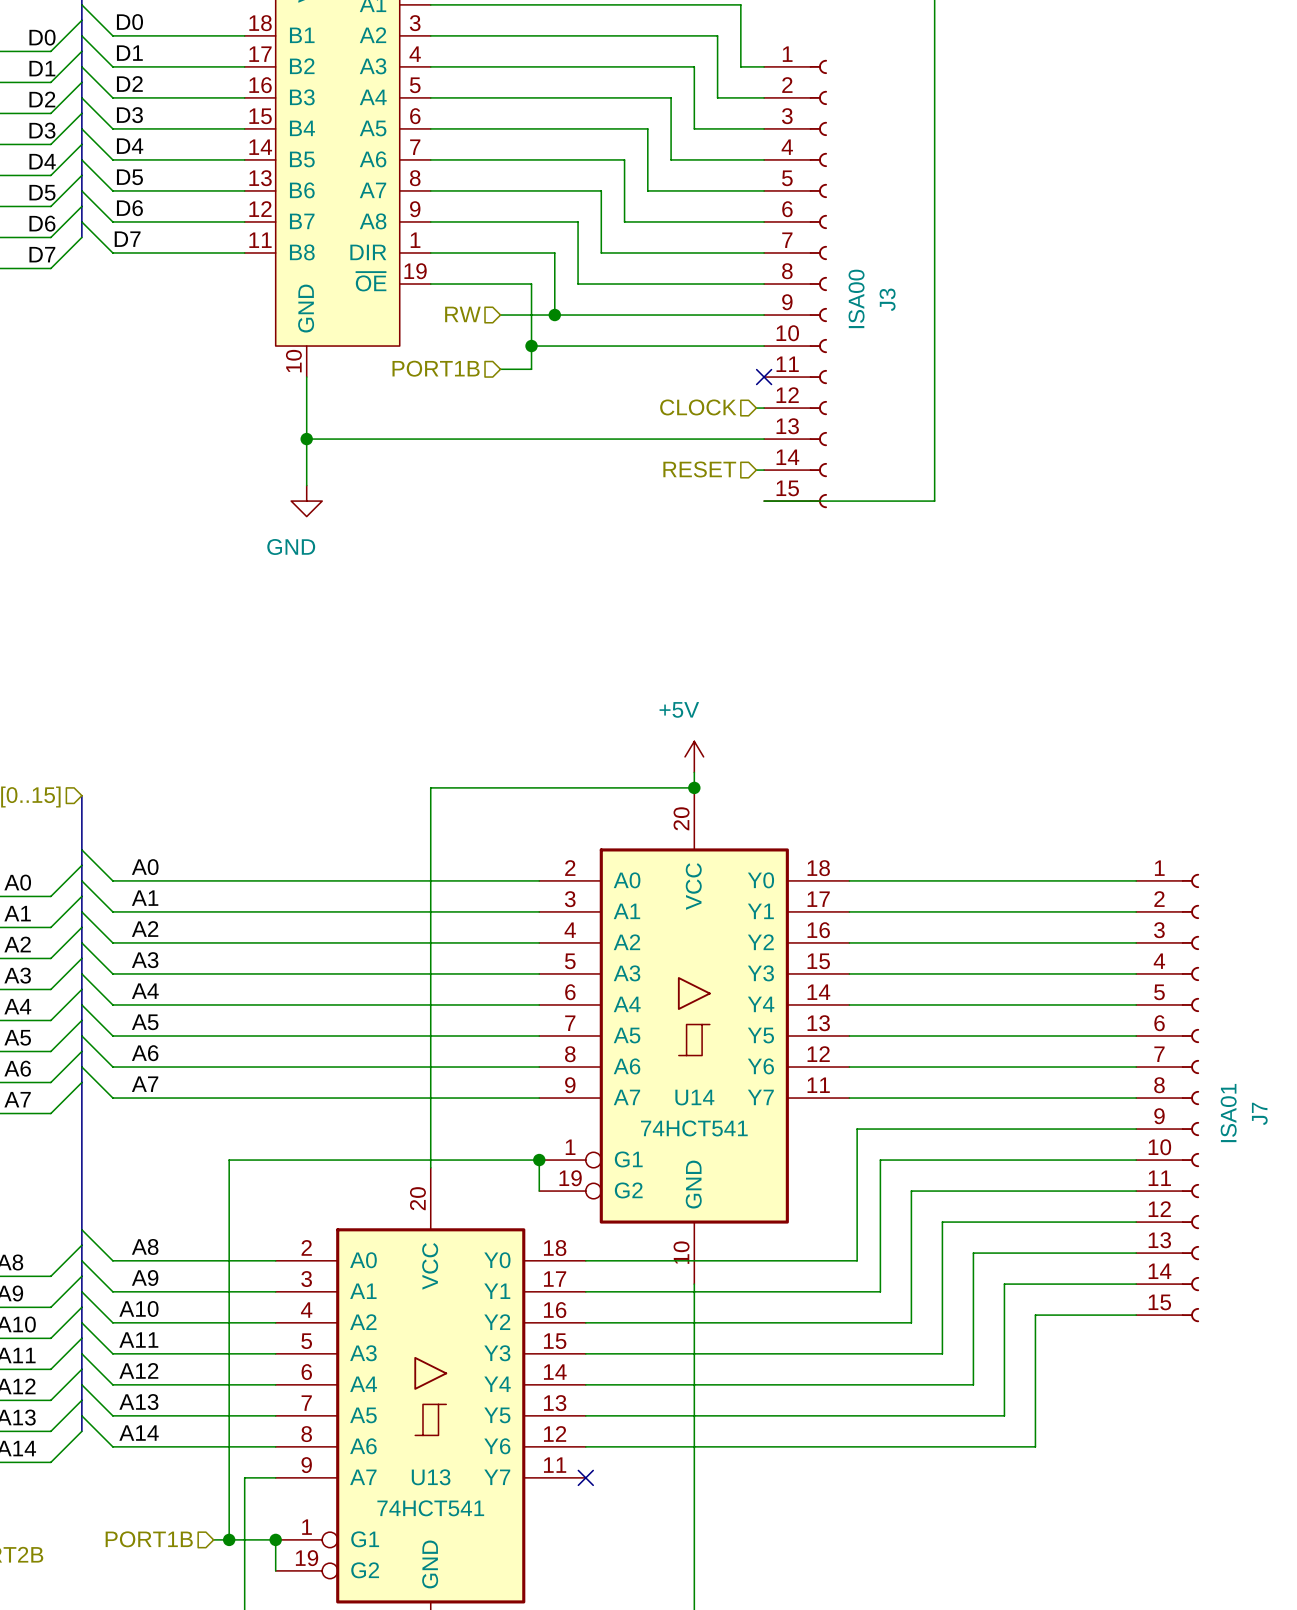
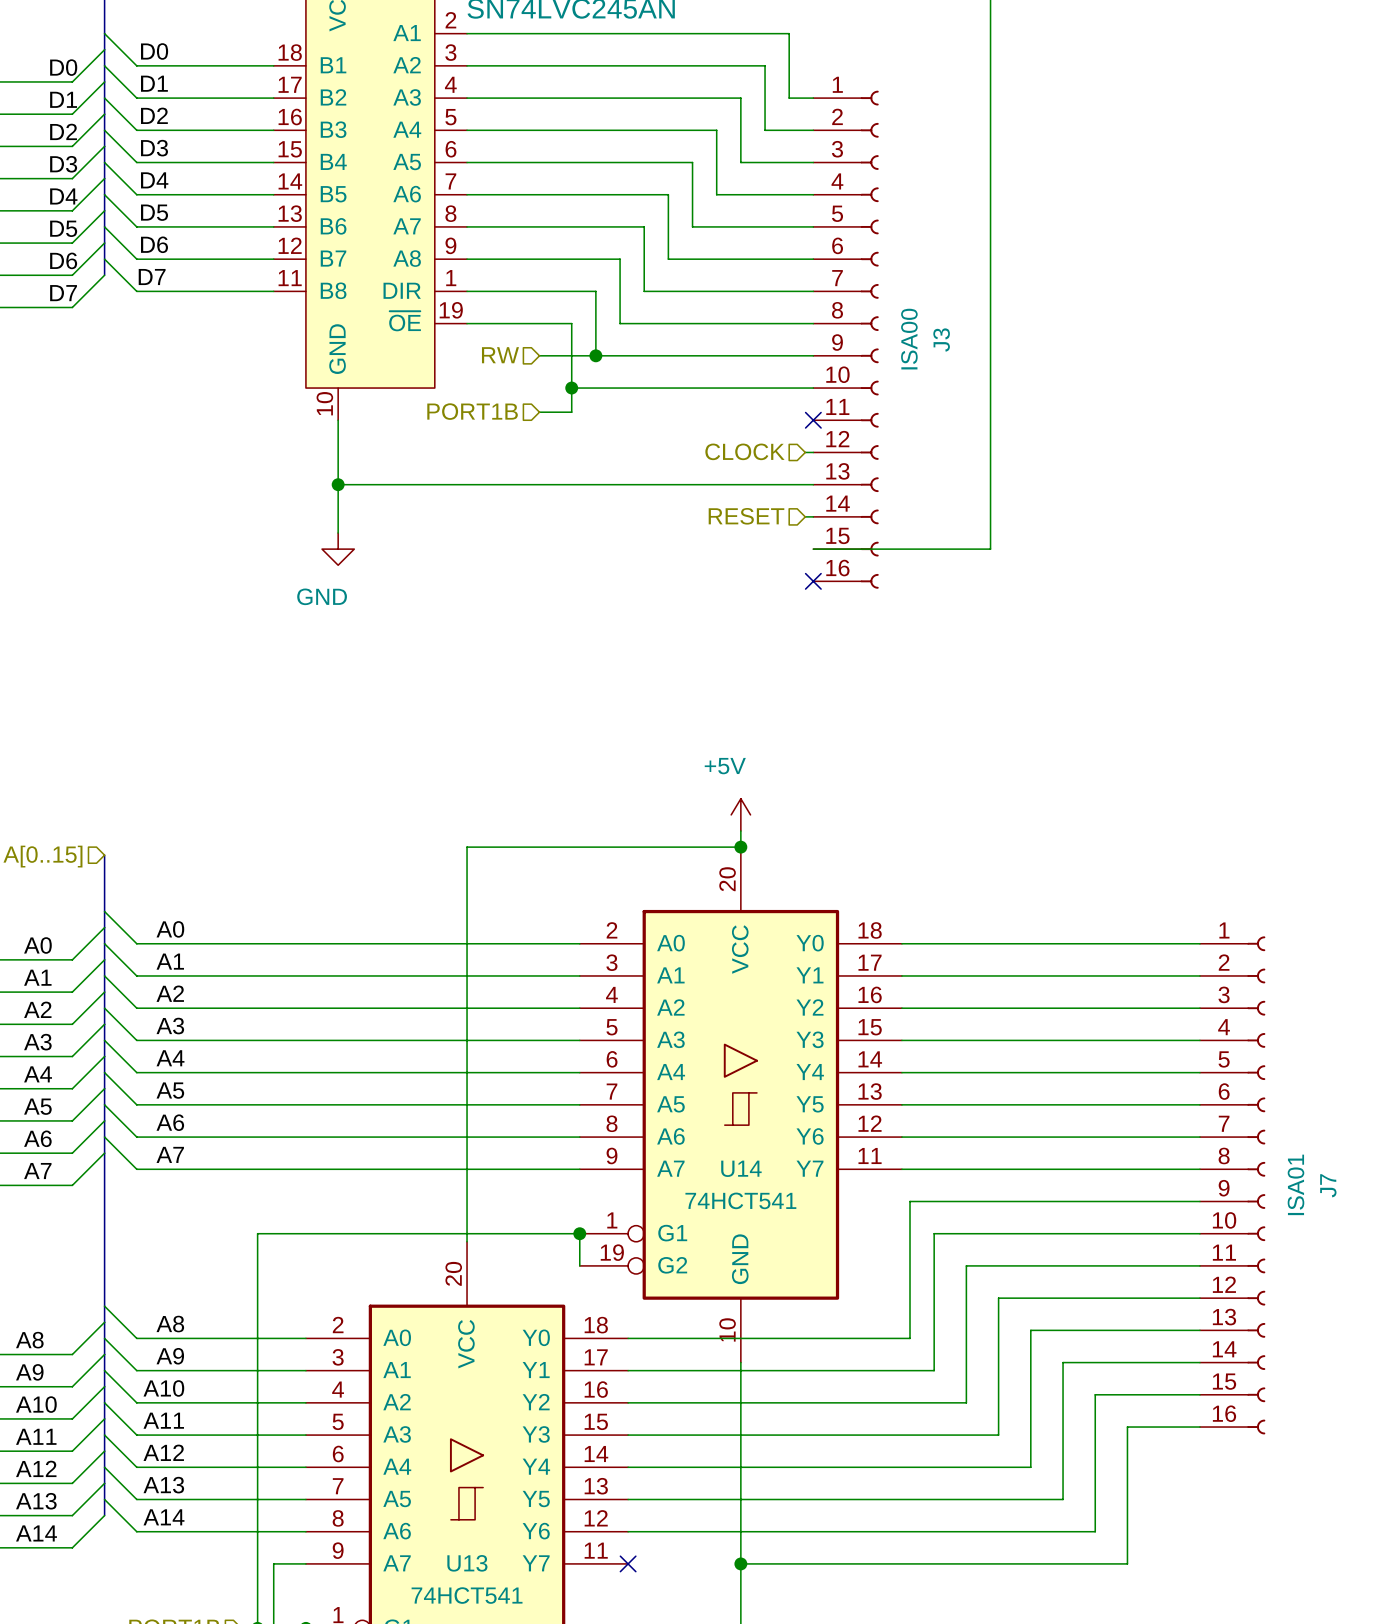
J3 symbol: [764, 59, 828, 509] -> [813, 90, 879, 589]
no-connect mark: none -> (813, 581)
J7 symbol: [1136, 873, 1200, 1323] -> [1199, 936, 1266, 1435]
wire: none -> (1199, 1427) (1127, 1427) (1127, 1563) (740, 1563)
junction: none -> (740, 1563)

